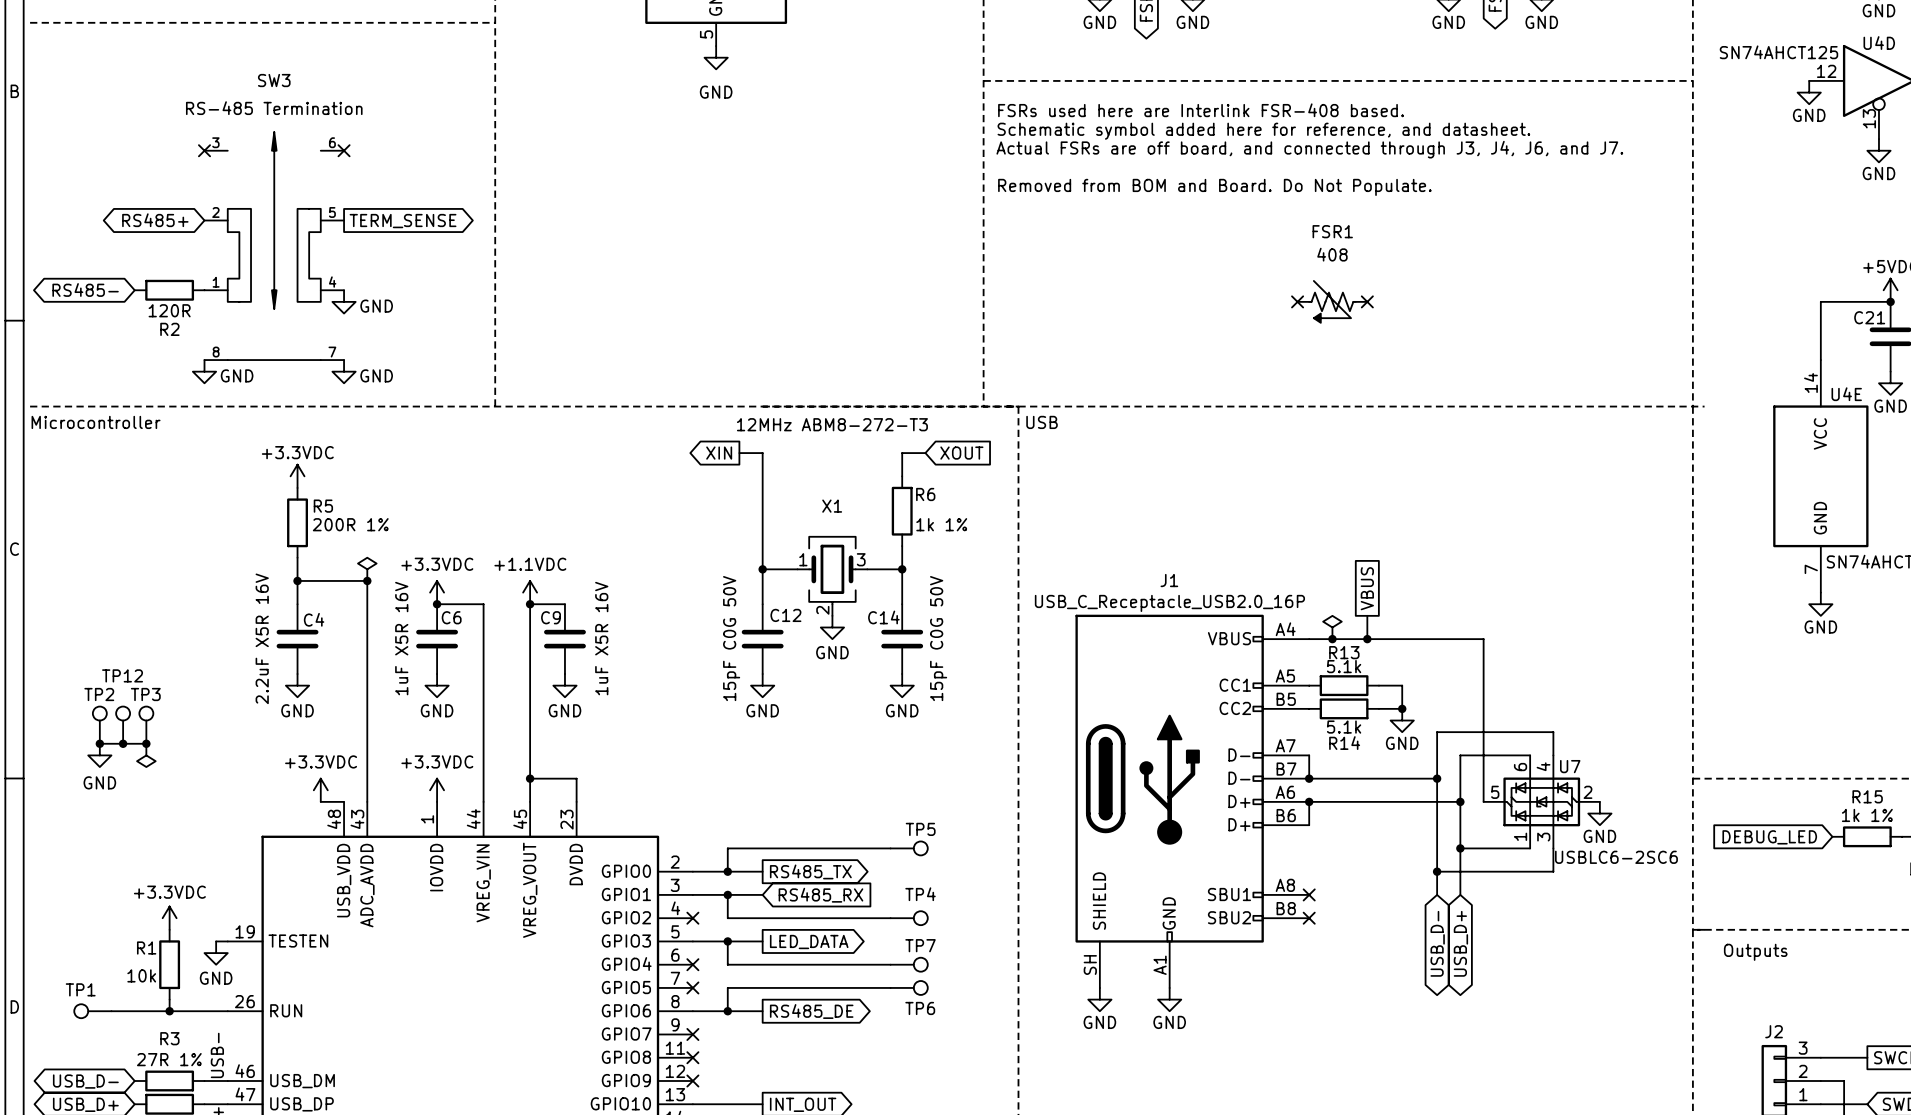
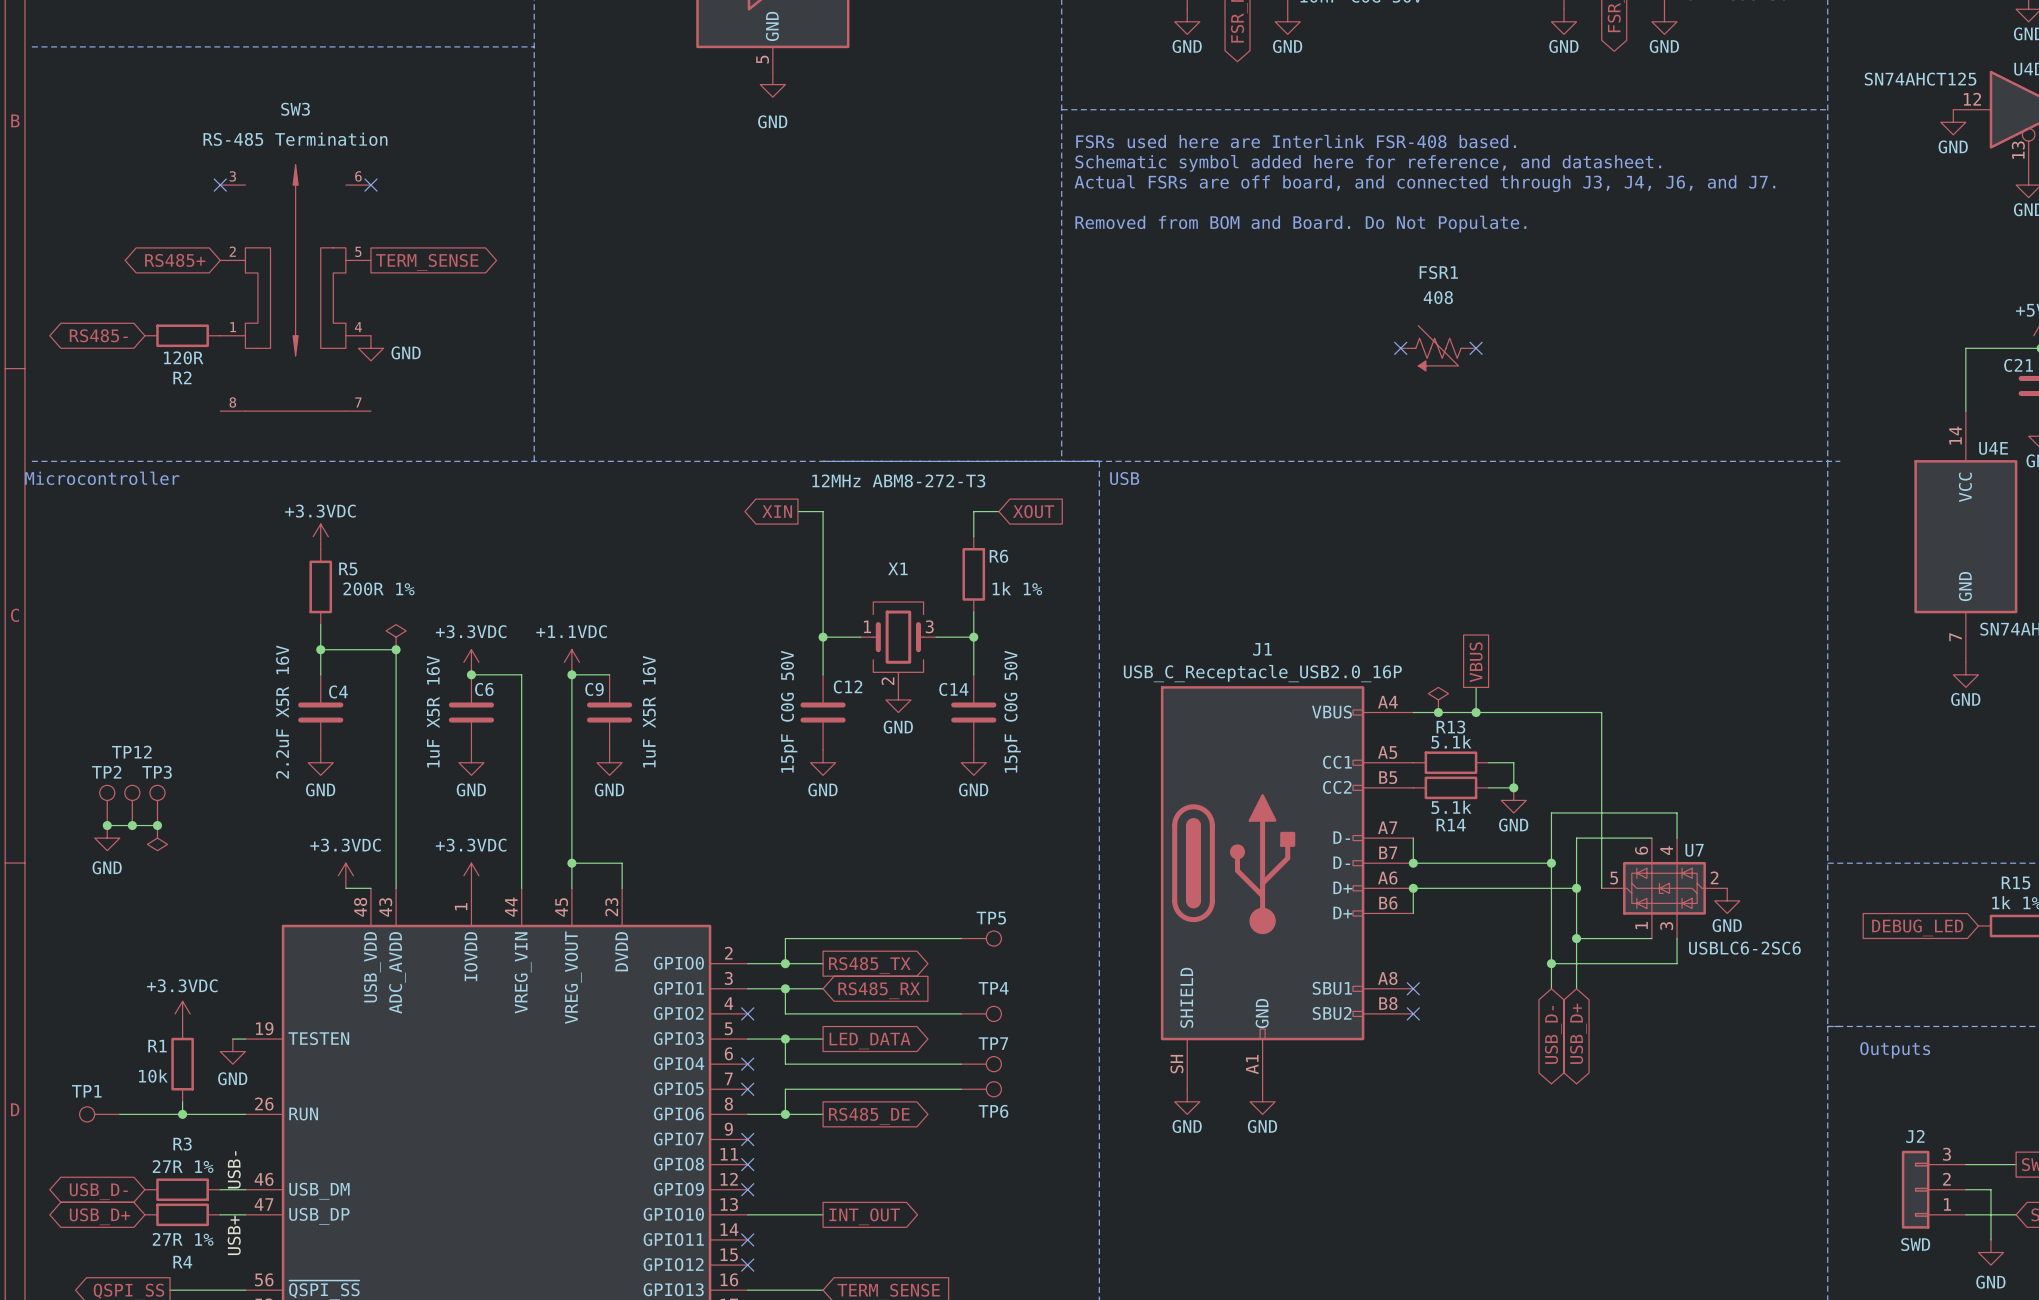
power symbol: GND (204, 371) -> none
power symbol: GND (344, 371) -> none

